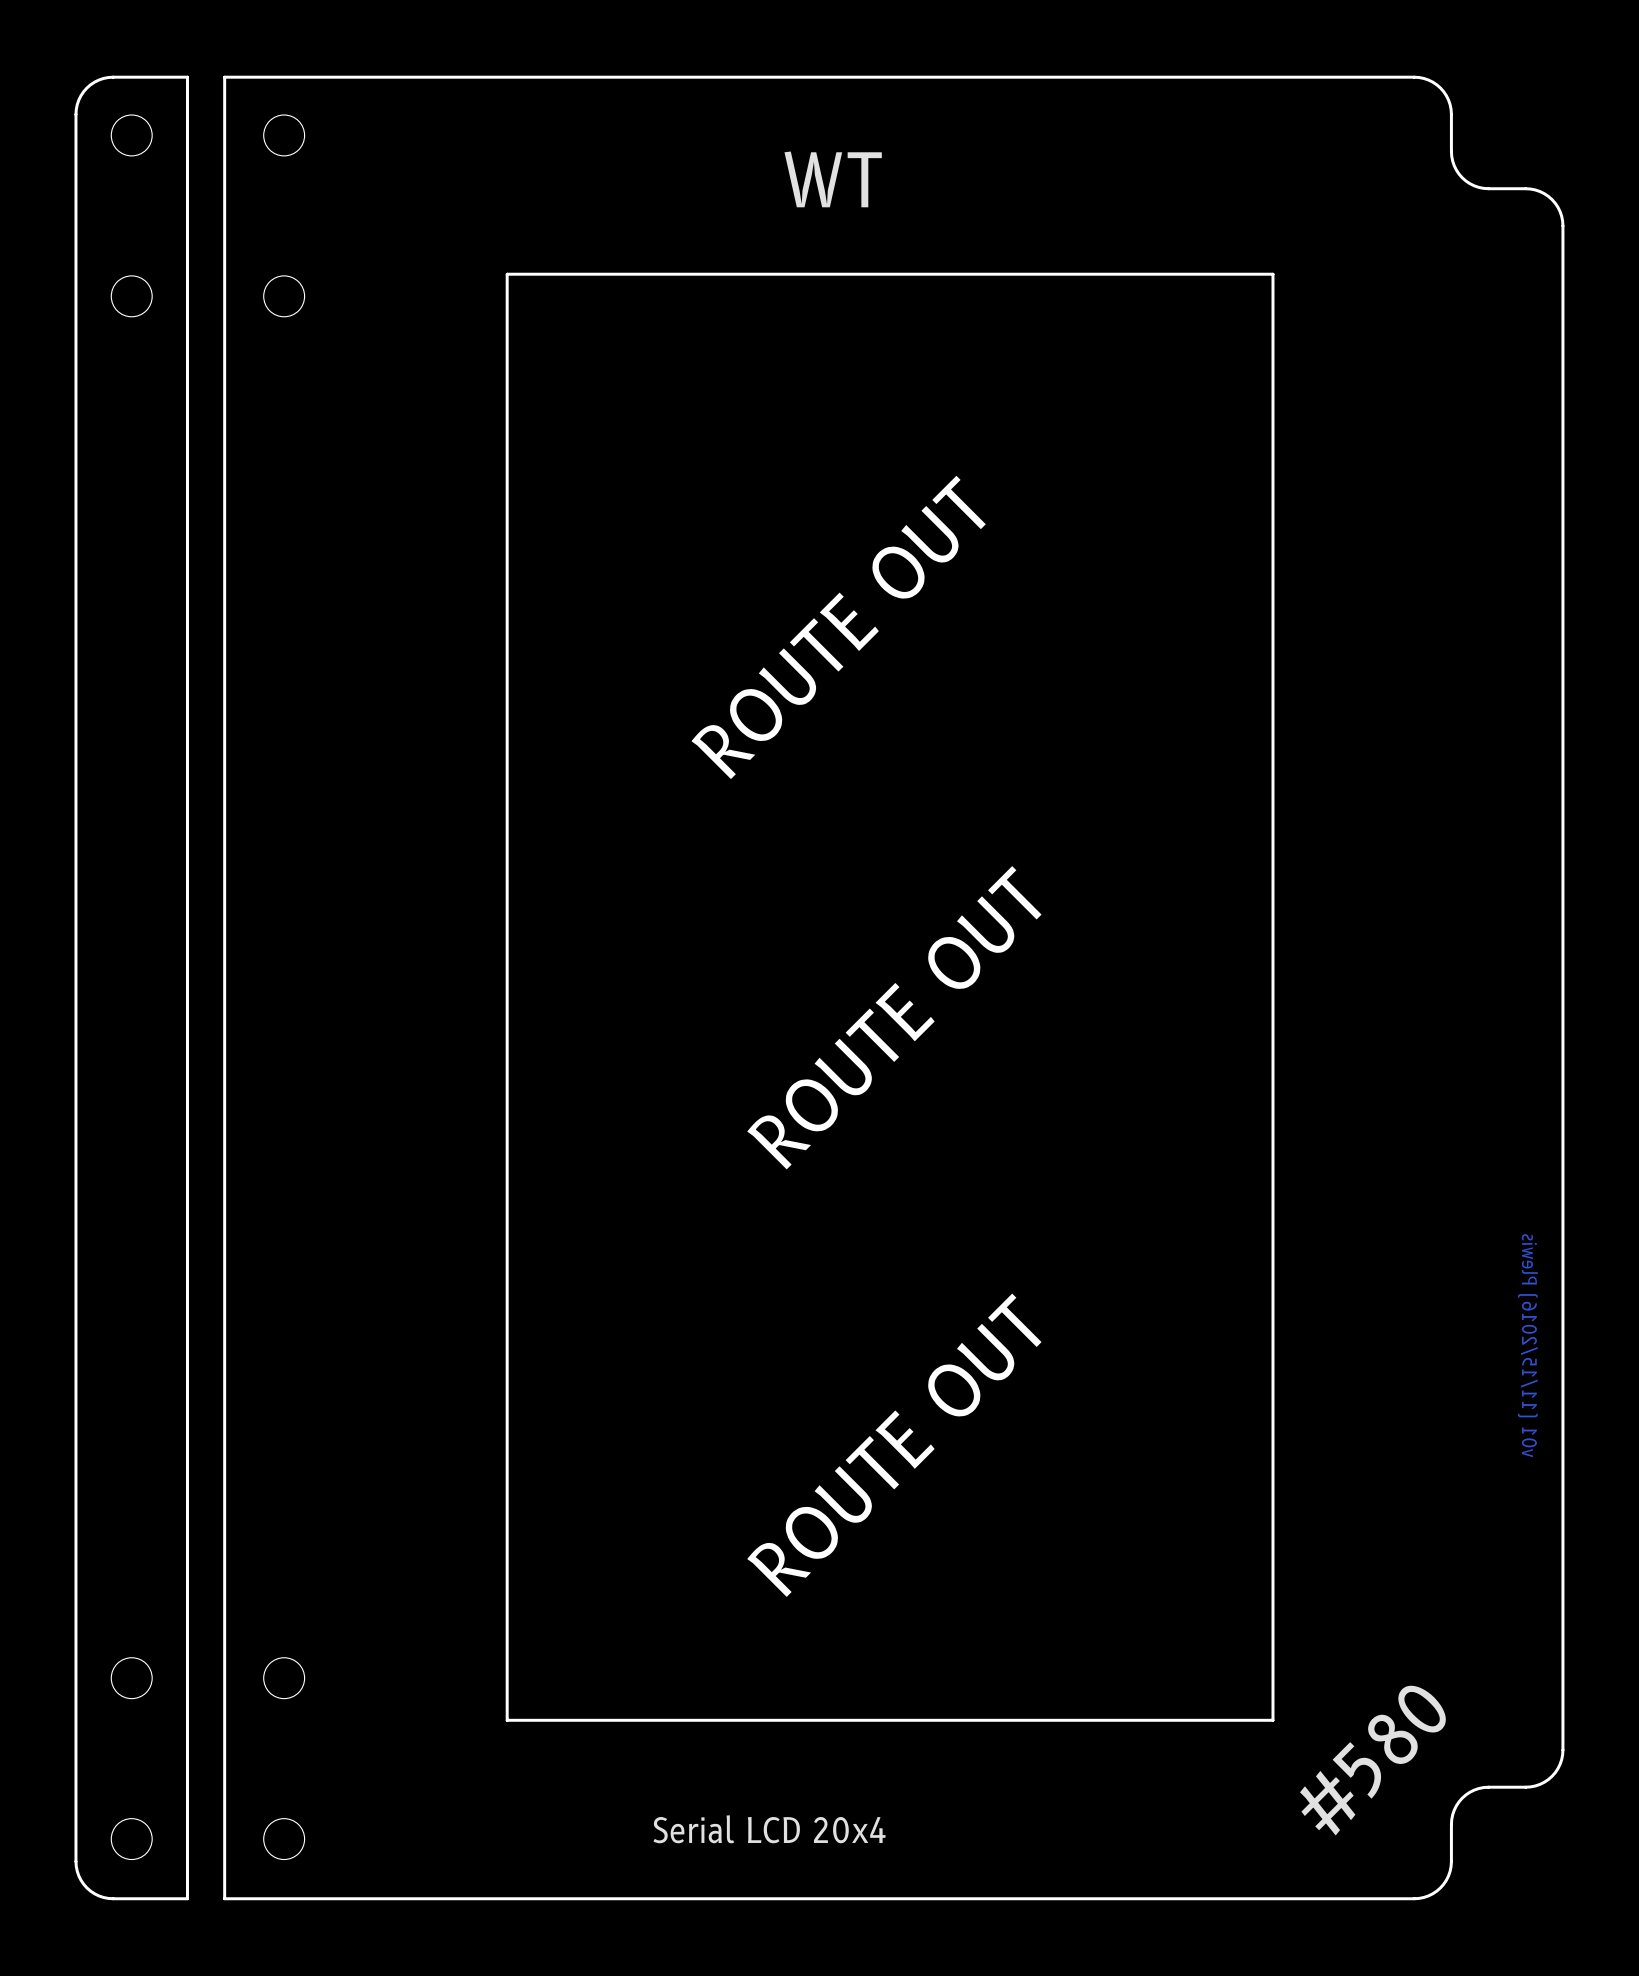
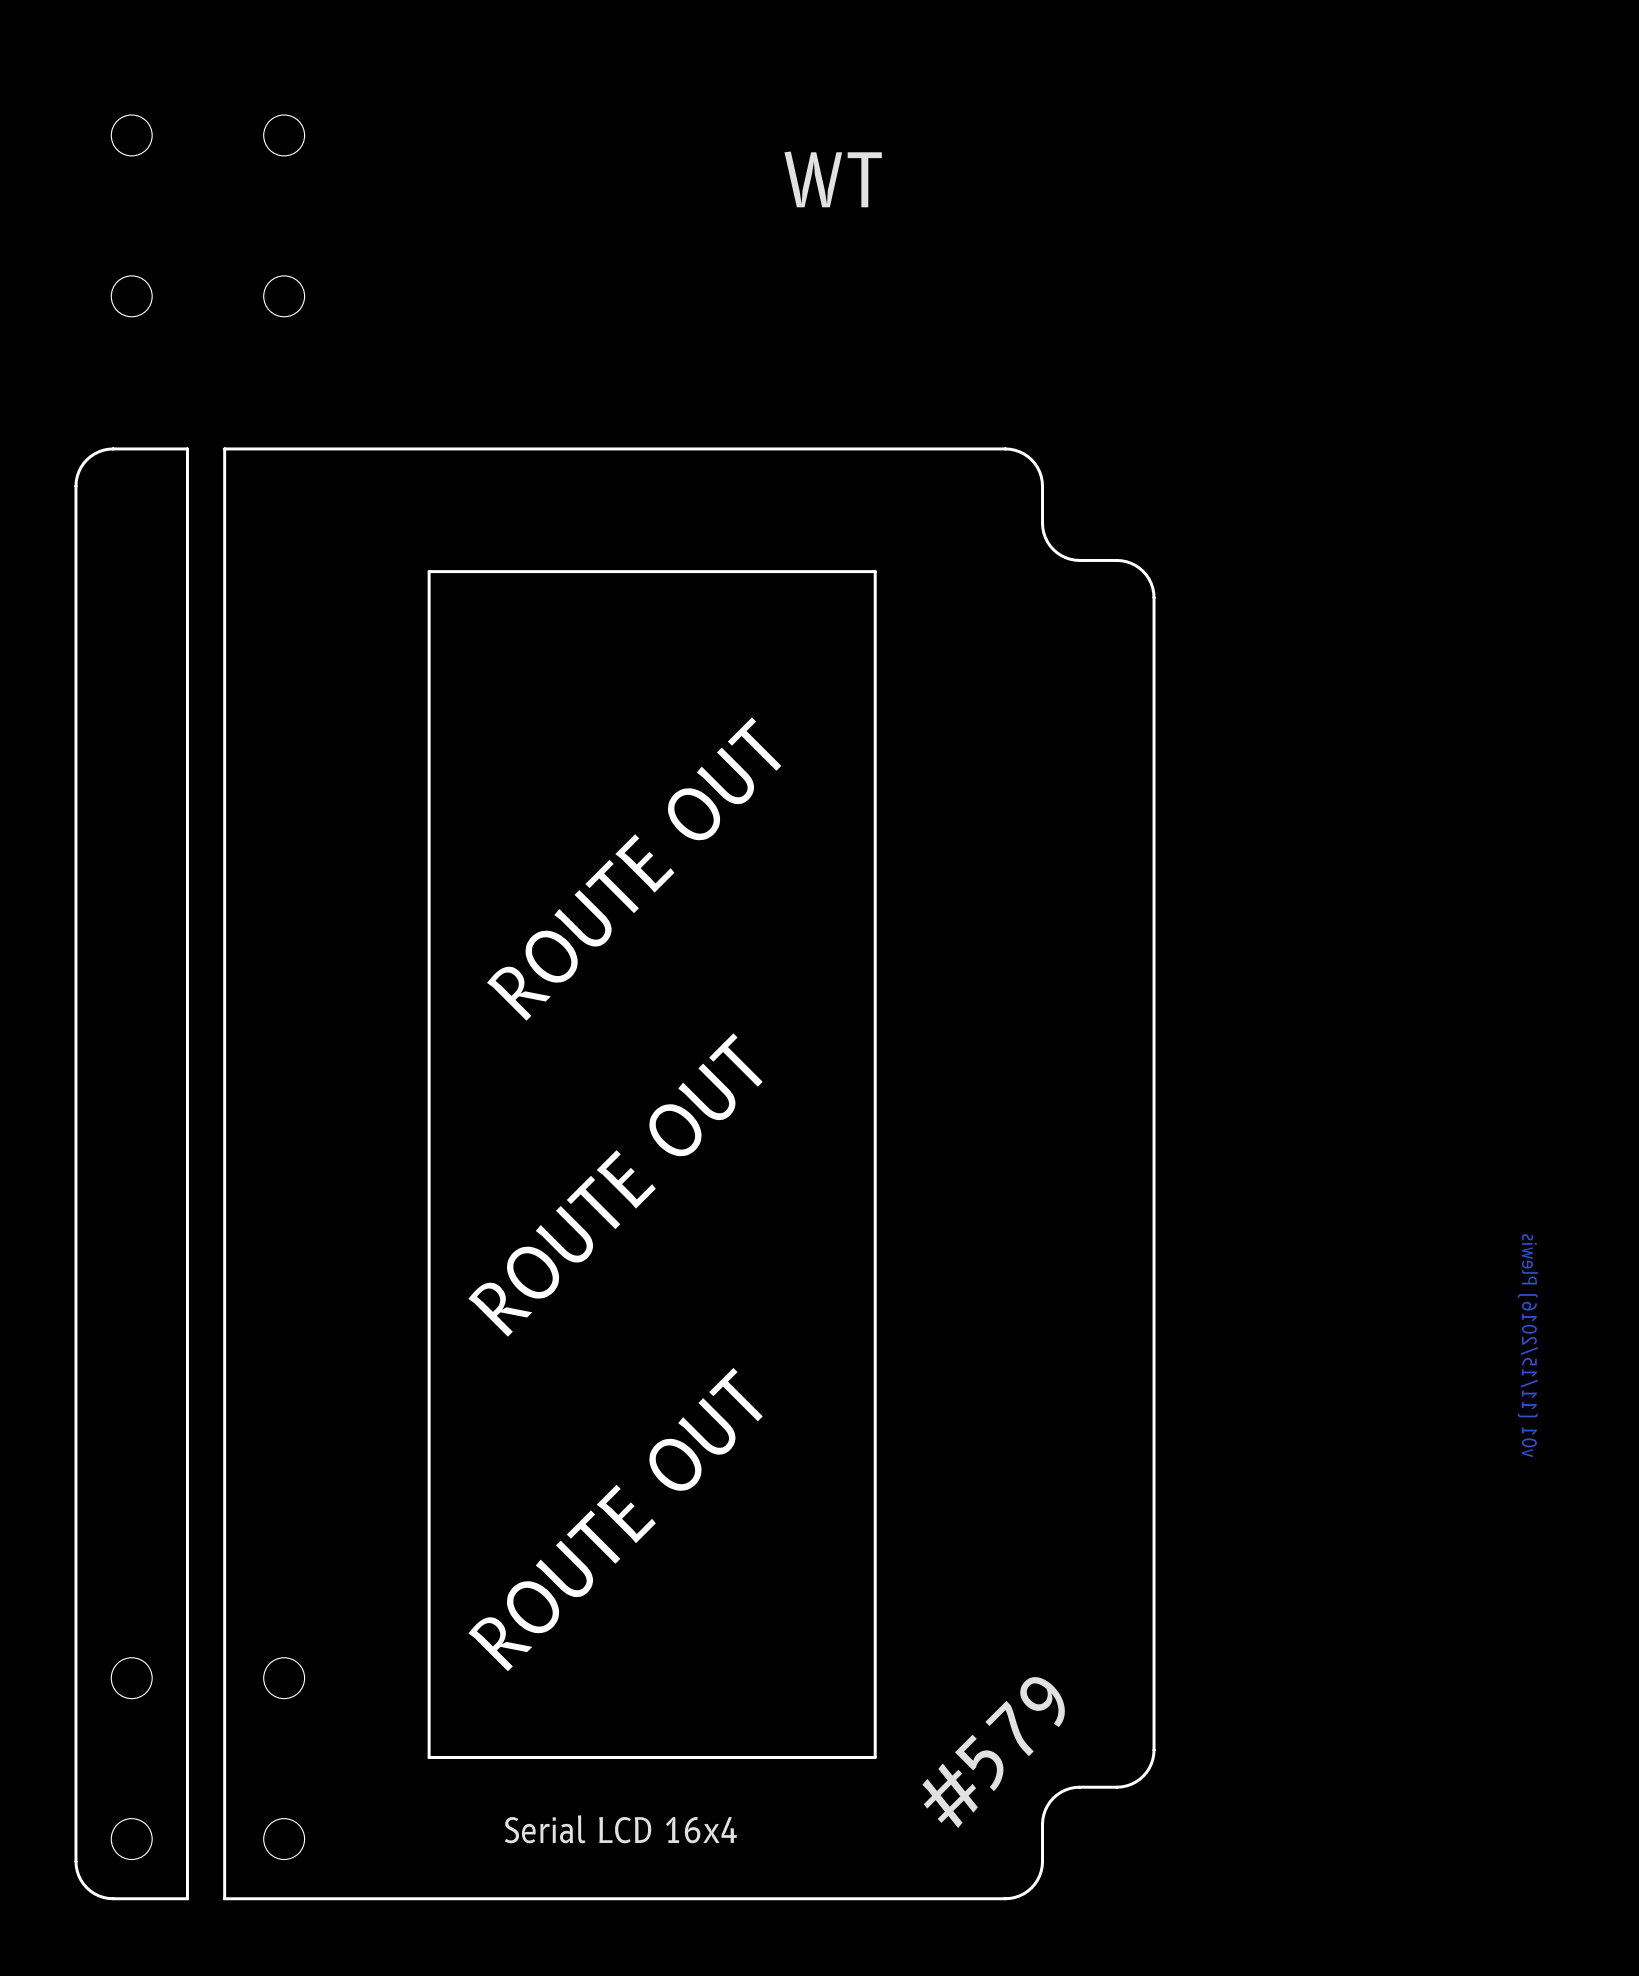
board edge: (507, 274) (1272, 274) (1272, 1720) (507, 1720) (507, 274) -> none
board edge: (187, 448) (187, 77) (103, 78) (86, 88) (78, 100) (76, 109) (75, 486) -> (187, 448) (103, 450) (90, 456) (83, 463) (77, 476) (75, 486)
board edge: (224, 448) (224, 77) (1419, 77) (1436, 84) (1448, 100) (1451, 114) (1451, 156) (1454, 165) (1462, 177) (1474, 185) (1483, 188) (1535, 189) (1548, 196) (1557, 207) (1562, 225) (1561, 1759) (1552, 1776) (1540, 1784) (1525, 1787) (1483, 1787) (1474, 1790) (1462, 1798) (1454, 1810) (1451, 1819) (1451, 1861) (1448, 1875) (1440, 1887) (1423, 1897) (1005, 1898) -> (224, 448) (1010, 449) (1027, 456) (1039, 471) (1042, 486) (1042, 528) (1045, 537) (1053, 549) (1065, 557) (1074, 560) (1126, 561) (1139, 568) (1149, 579) (1154, 597) (1153, 1754) (1146, 1772) (1131, 1784) (1116, 1787) (1074, 1787) (1065, 1790) (1053, 1798) (1045, 1810) (1042, 1819) (1042, 1861) (1039, 1875) (1027, 1891) (1014, 1897) (1005, 1898)
board edge: none -> (429, 571) (429, 1757) (875, 1757) (875, 571) (429, 571)
text: ROUTE OUT (838, 627) -> none
text: none -> ROUTE OUT (634, 869)
text: ROUTE OUT (894, 1017) -> none
text: none -> ROUTE OUT (615, 1185)
text: ROUTE OUT (894, 1445) -> none
text: none -> ROUTE OUT (615, 1519)
text: none -> #579 (993, 1752)
text: #580 (1372, 1760) -> none
text: Serial LCD 20x4 (769, 1829) -> Serial LCD 16x4 (620, 1829)

